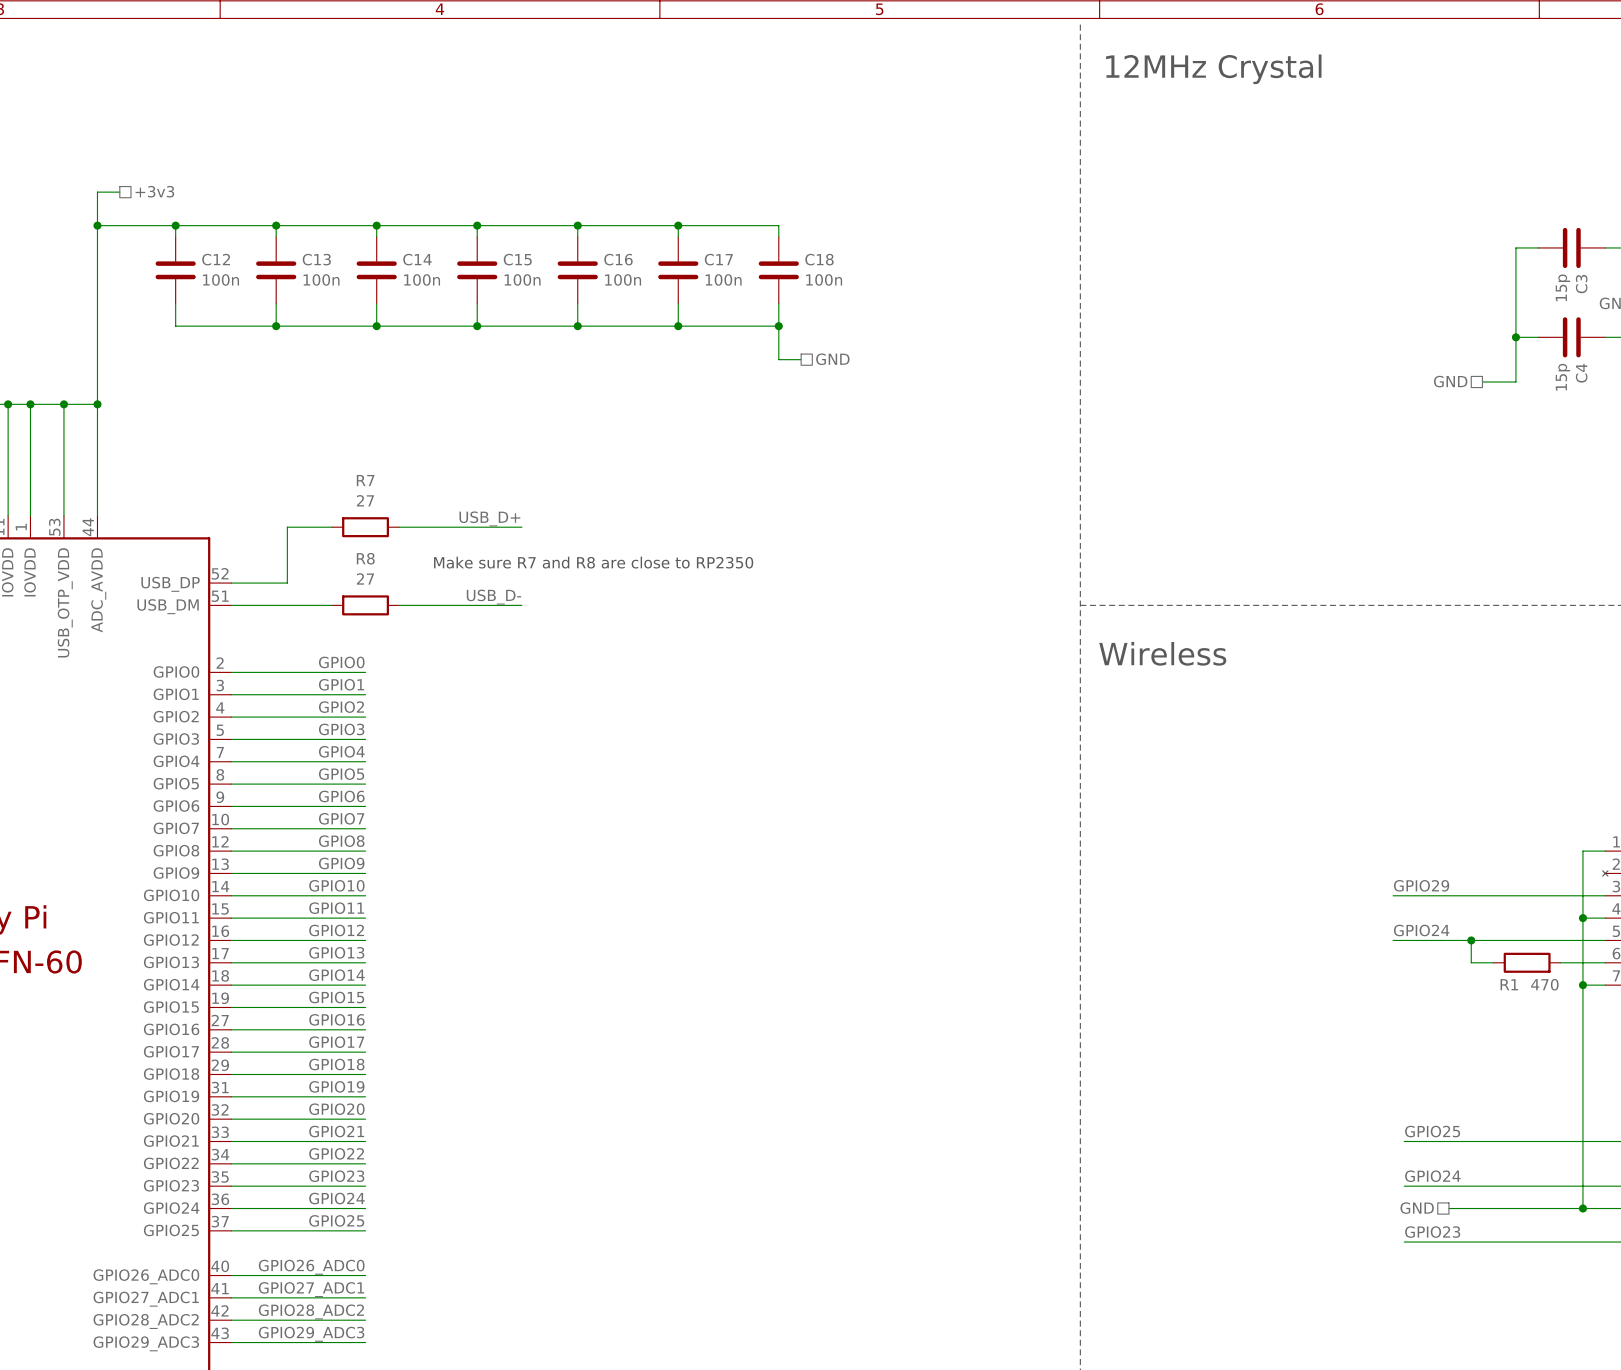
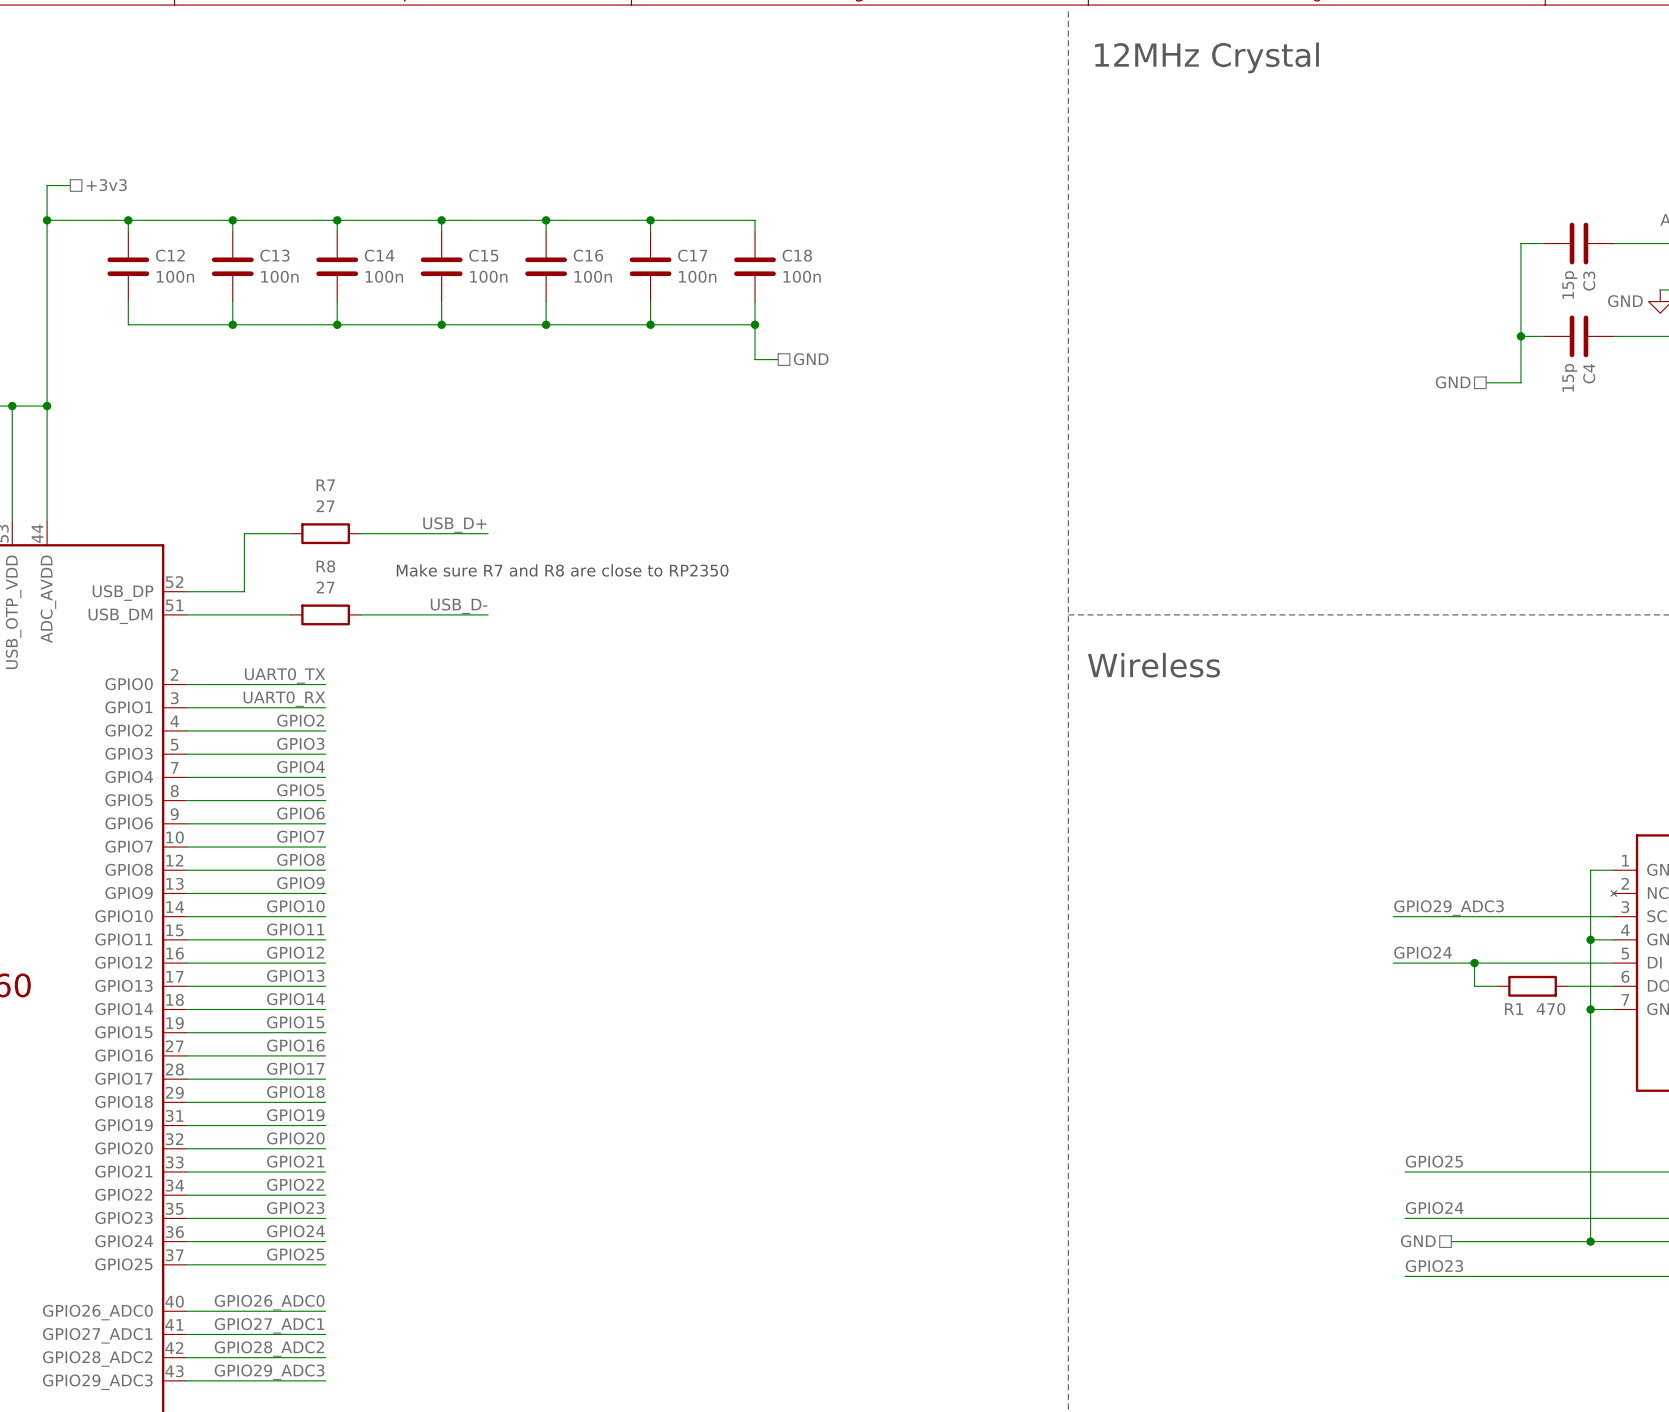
label: GPIO0 (341, 662) -> UART0_TX (285, 675)
label: GPIO1 (341, 684) -> UART0_RX (284, 699)
label: GPIO29 (1421, 885) -> GPIO29_ADC3 (1449, 908)

